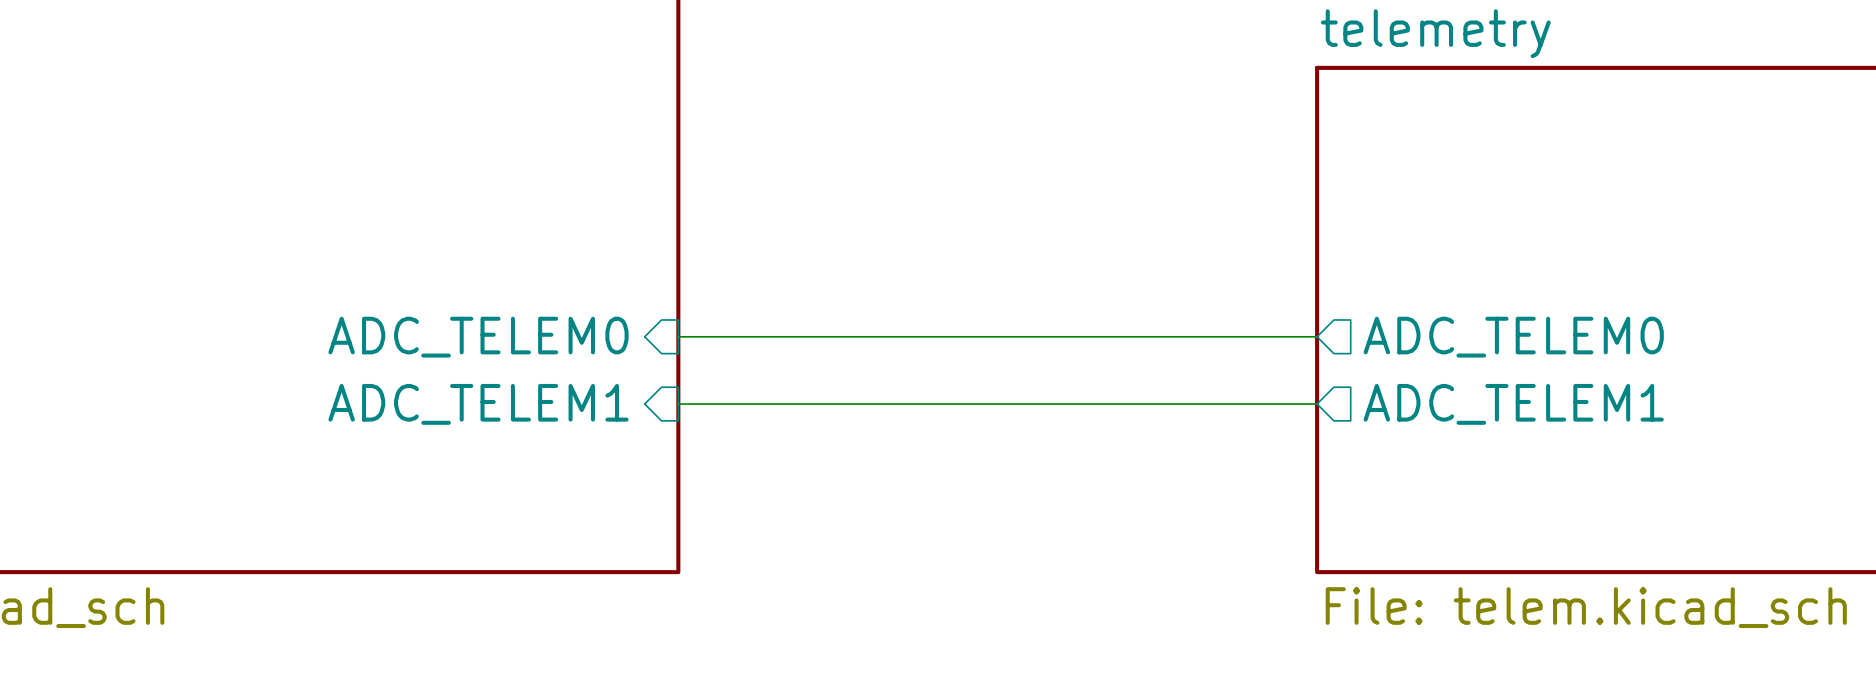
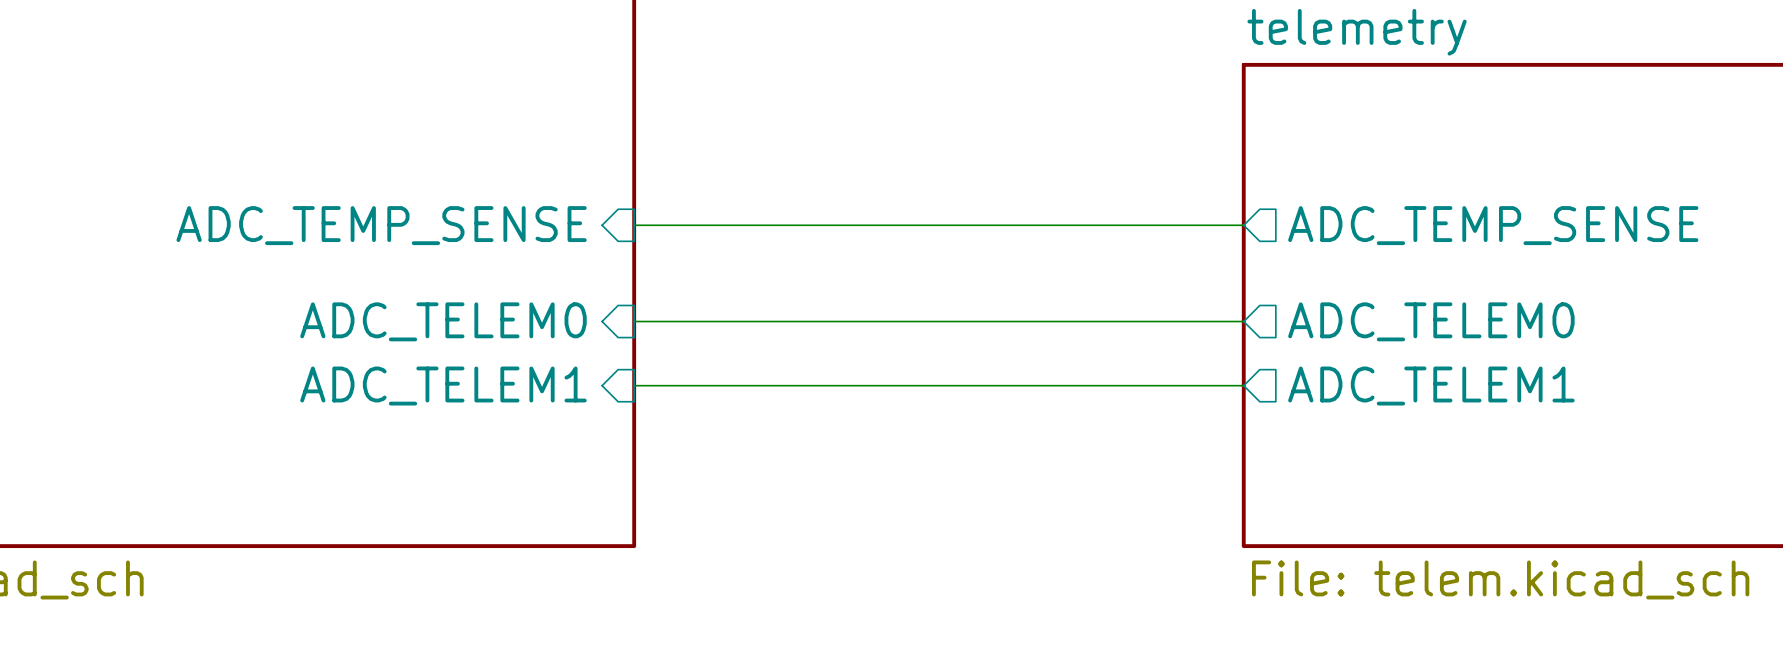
wire: none -> (634, 225) (1243, 225)
sheet pin: none -> ADC_TEMP_SENSE (381, 225)
sheet pin: none -> ADC_TEMP_SENSE (1493, 225)

